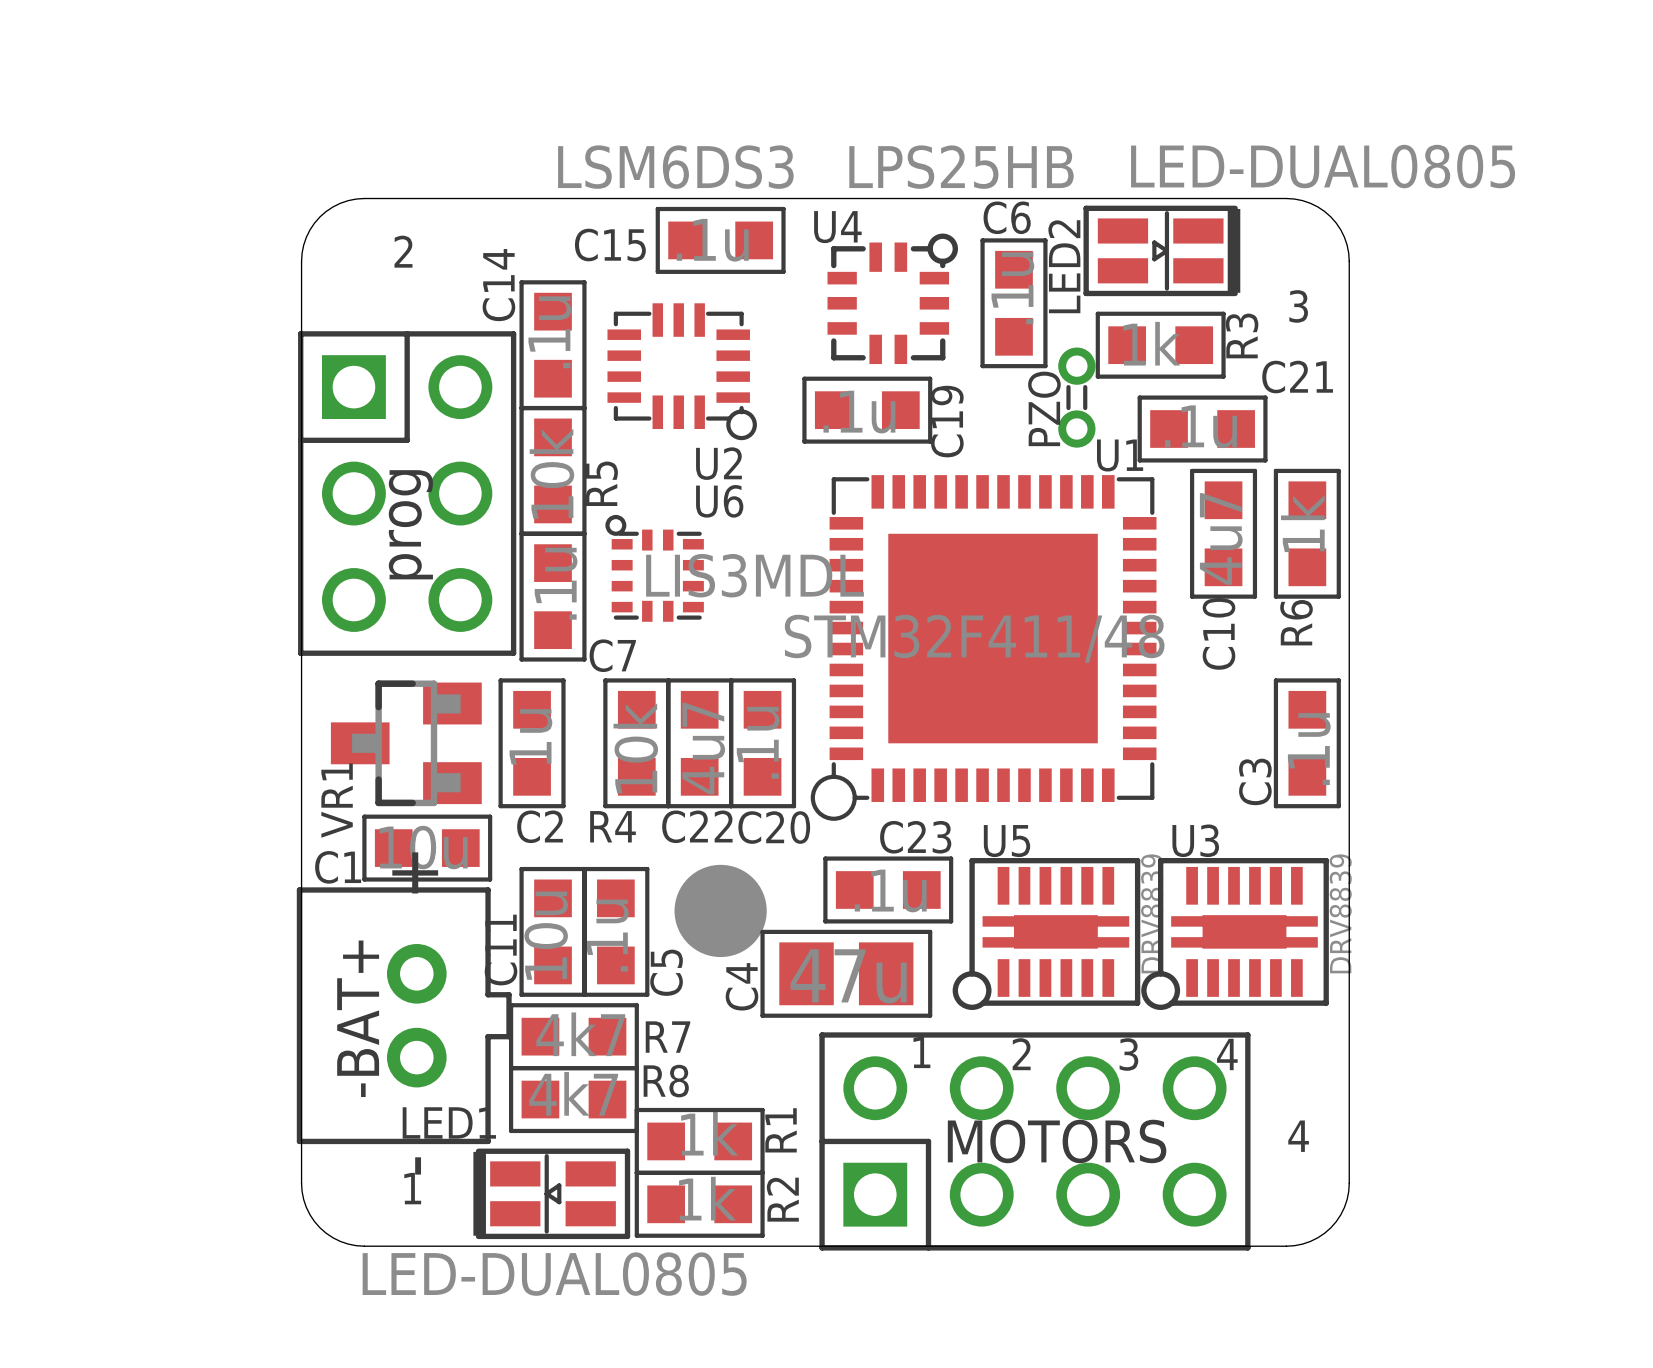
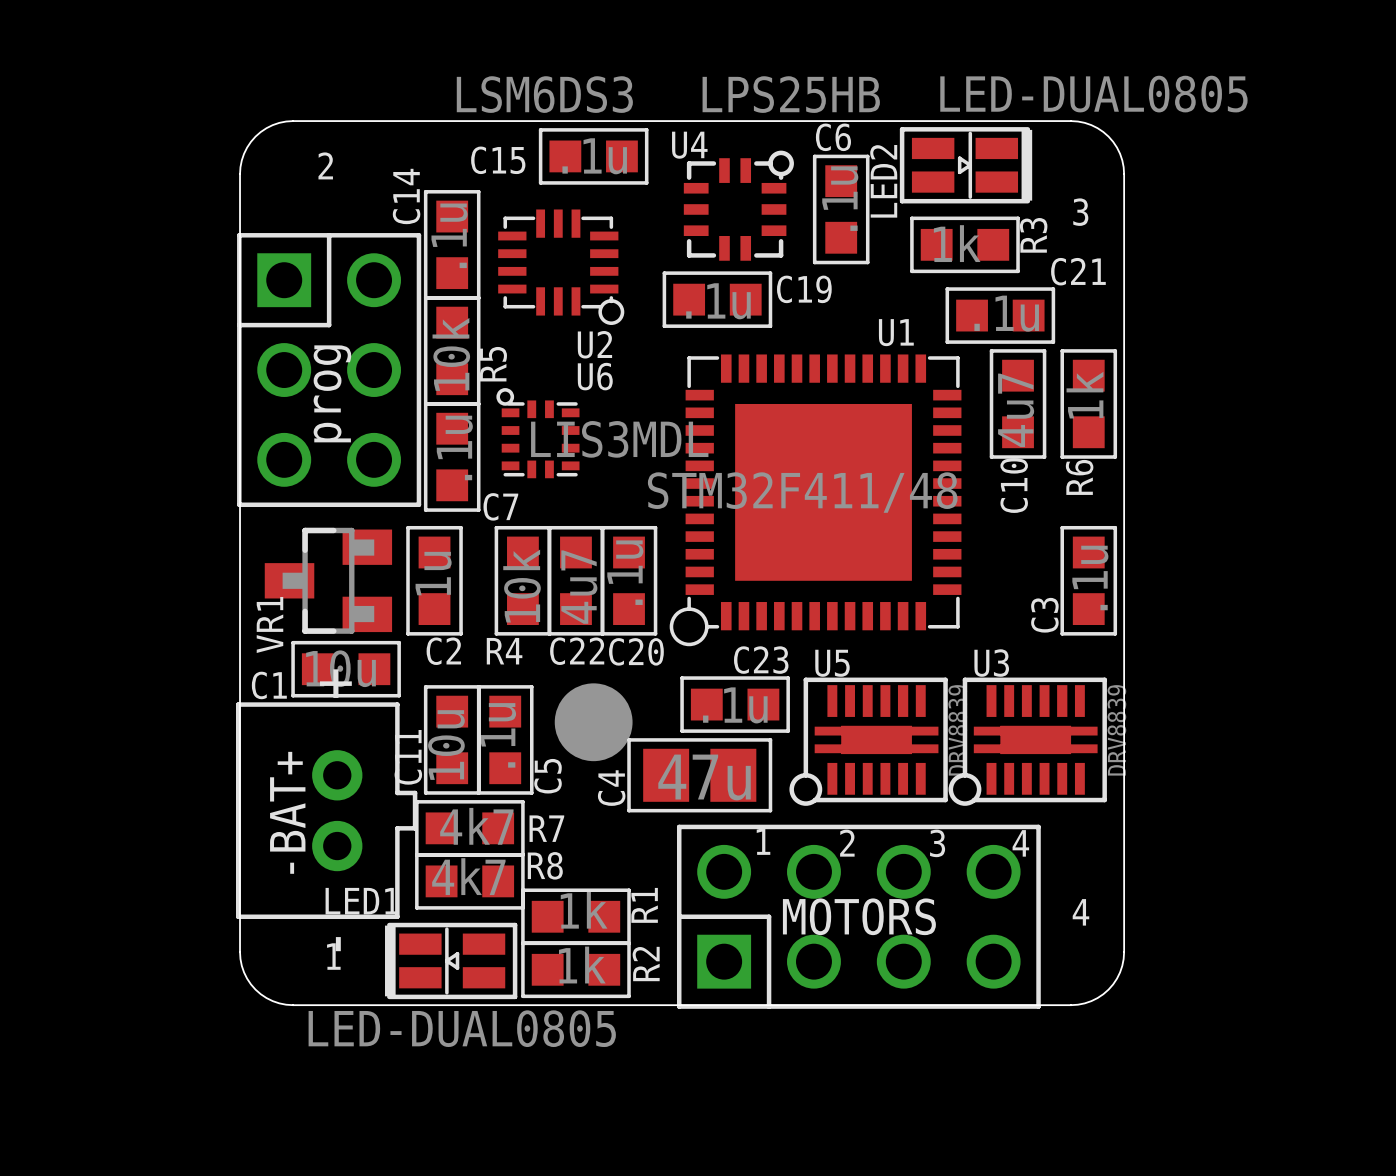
part: (1076, 366) -> none
line: (1068, 387) (1068, 408) -> none
line: (1085, 387) (1085, 408) -> none
text: PZO (1044, 408) -> none
C19 name rotation: 0° (947, 421) -> 90° clockwise (804, 289)
part: (1076, 429) -> none
U1 name position: U1 (1120, 455) -> U1 (896, 332)

